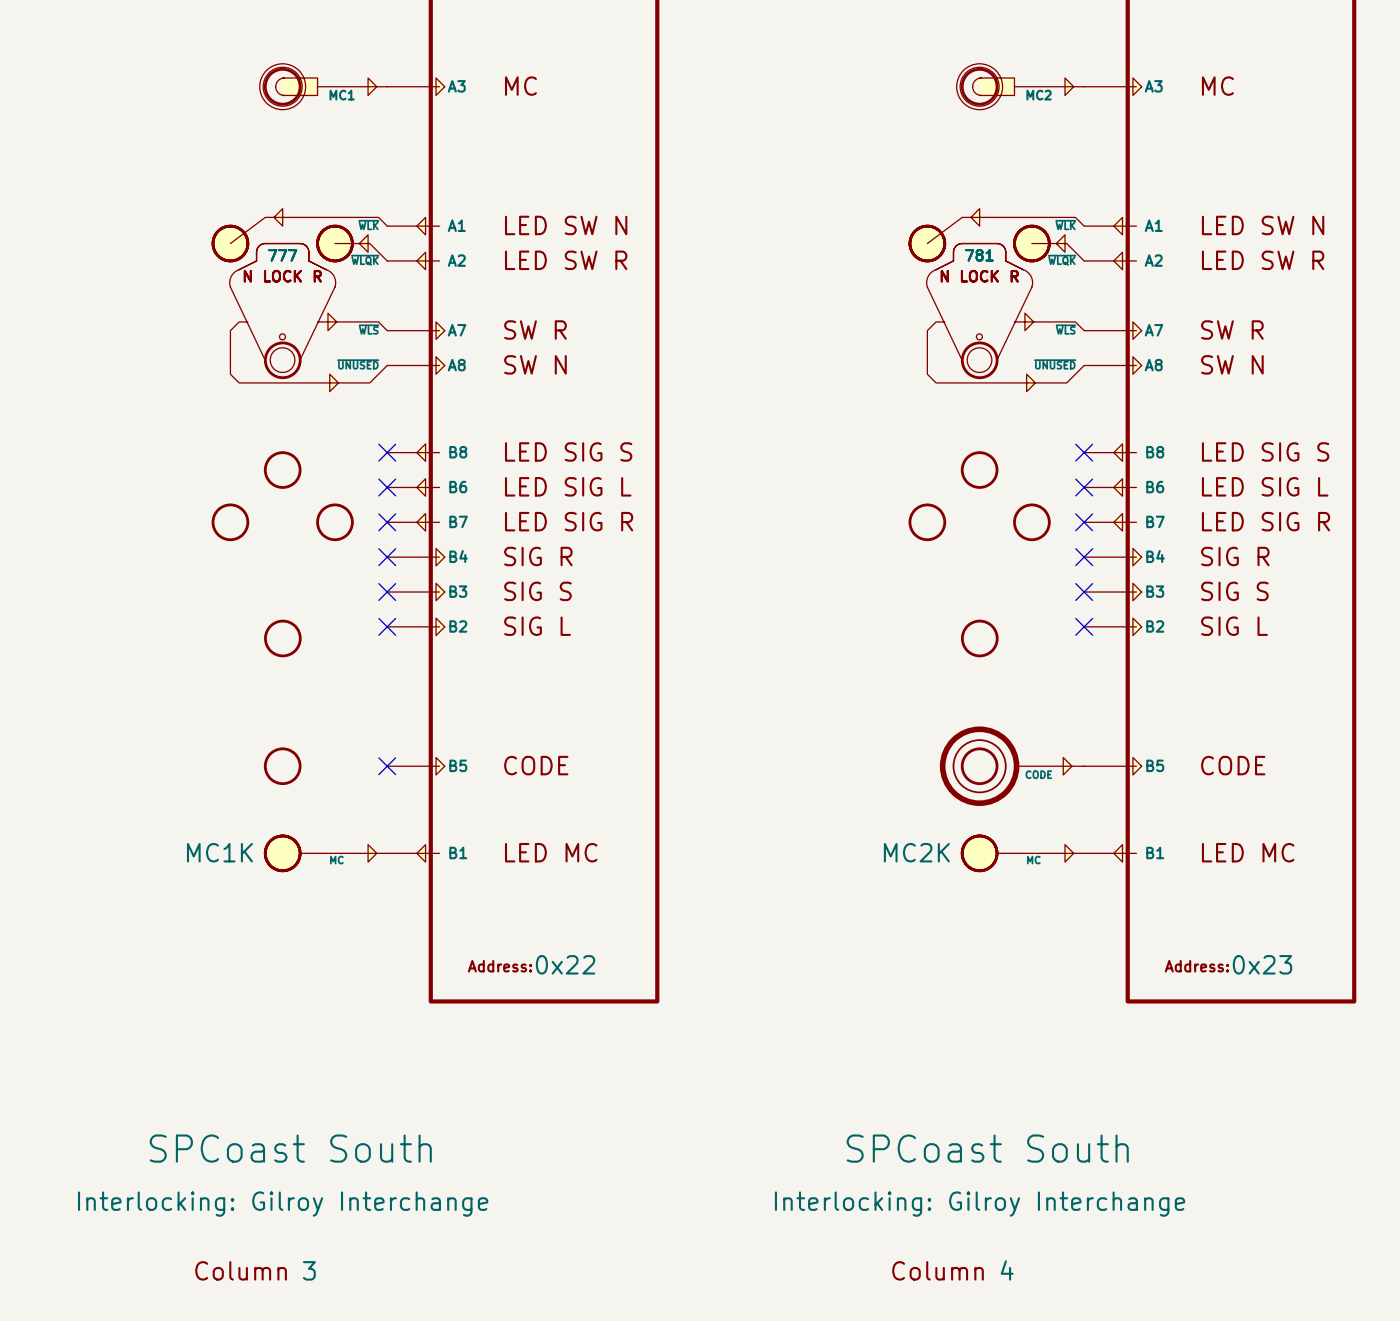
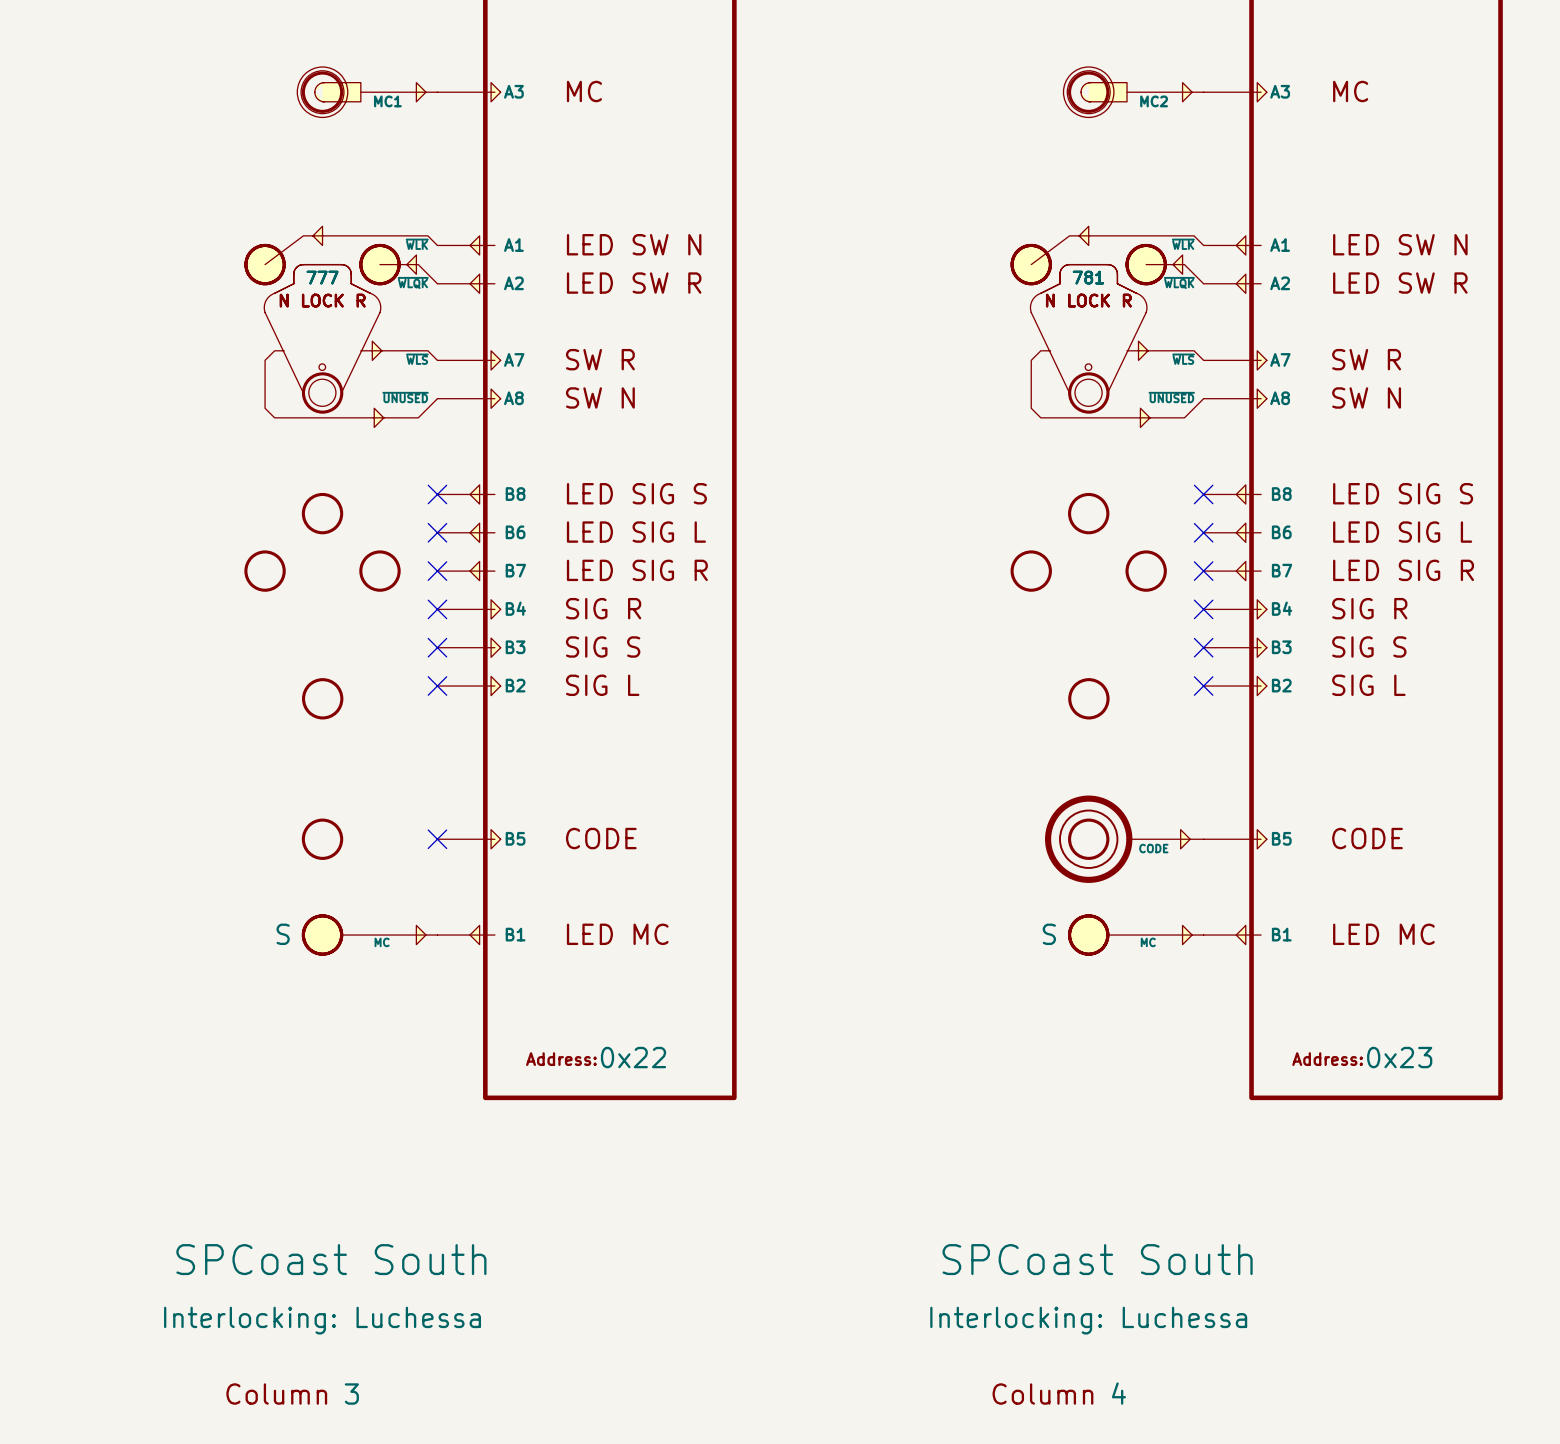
part text: MC1K (219, 852) -> S (283, 934)
part text: MC2K (916, 852) -> S (1049, 934)
part text: Interlocking: Gilroy Interchange (283, 1204) -> Interlocking: Luchessa (322, 1320)
part text: Interlocking: Gilroy Interchange (980, 1204) -> Interlocking: Luchessa (1088, 1320)

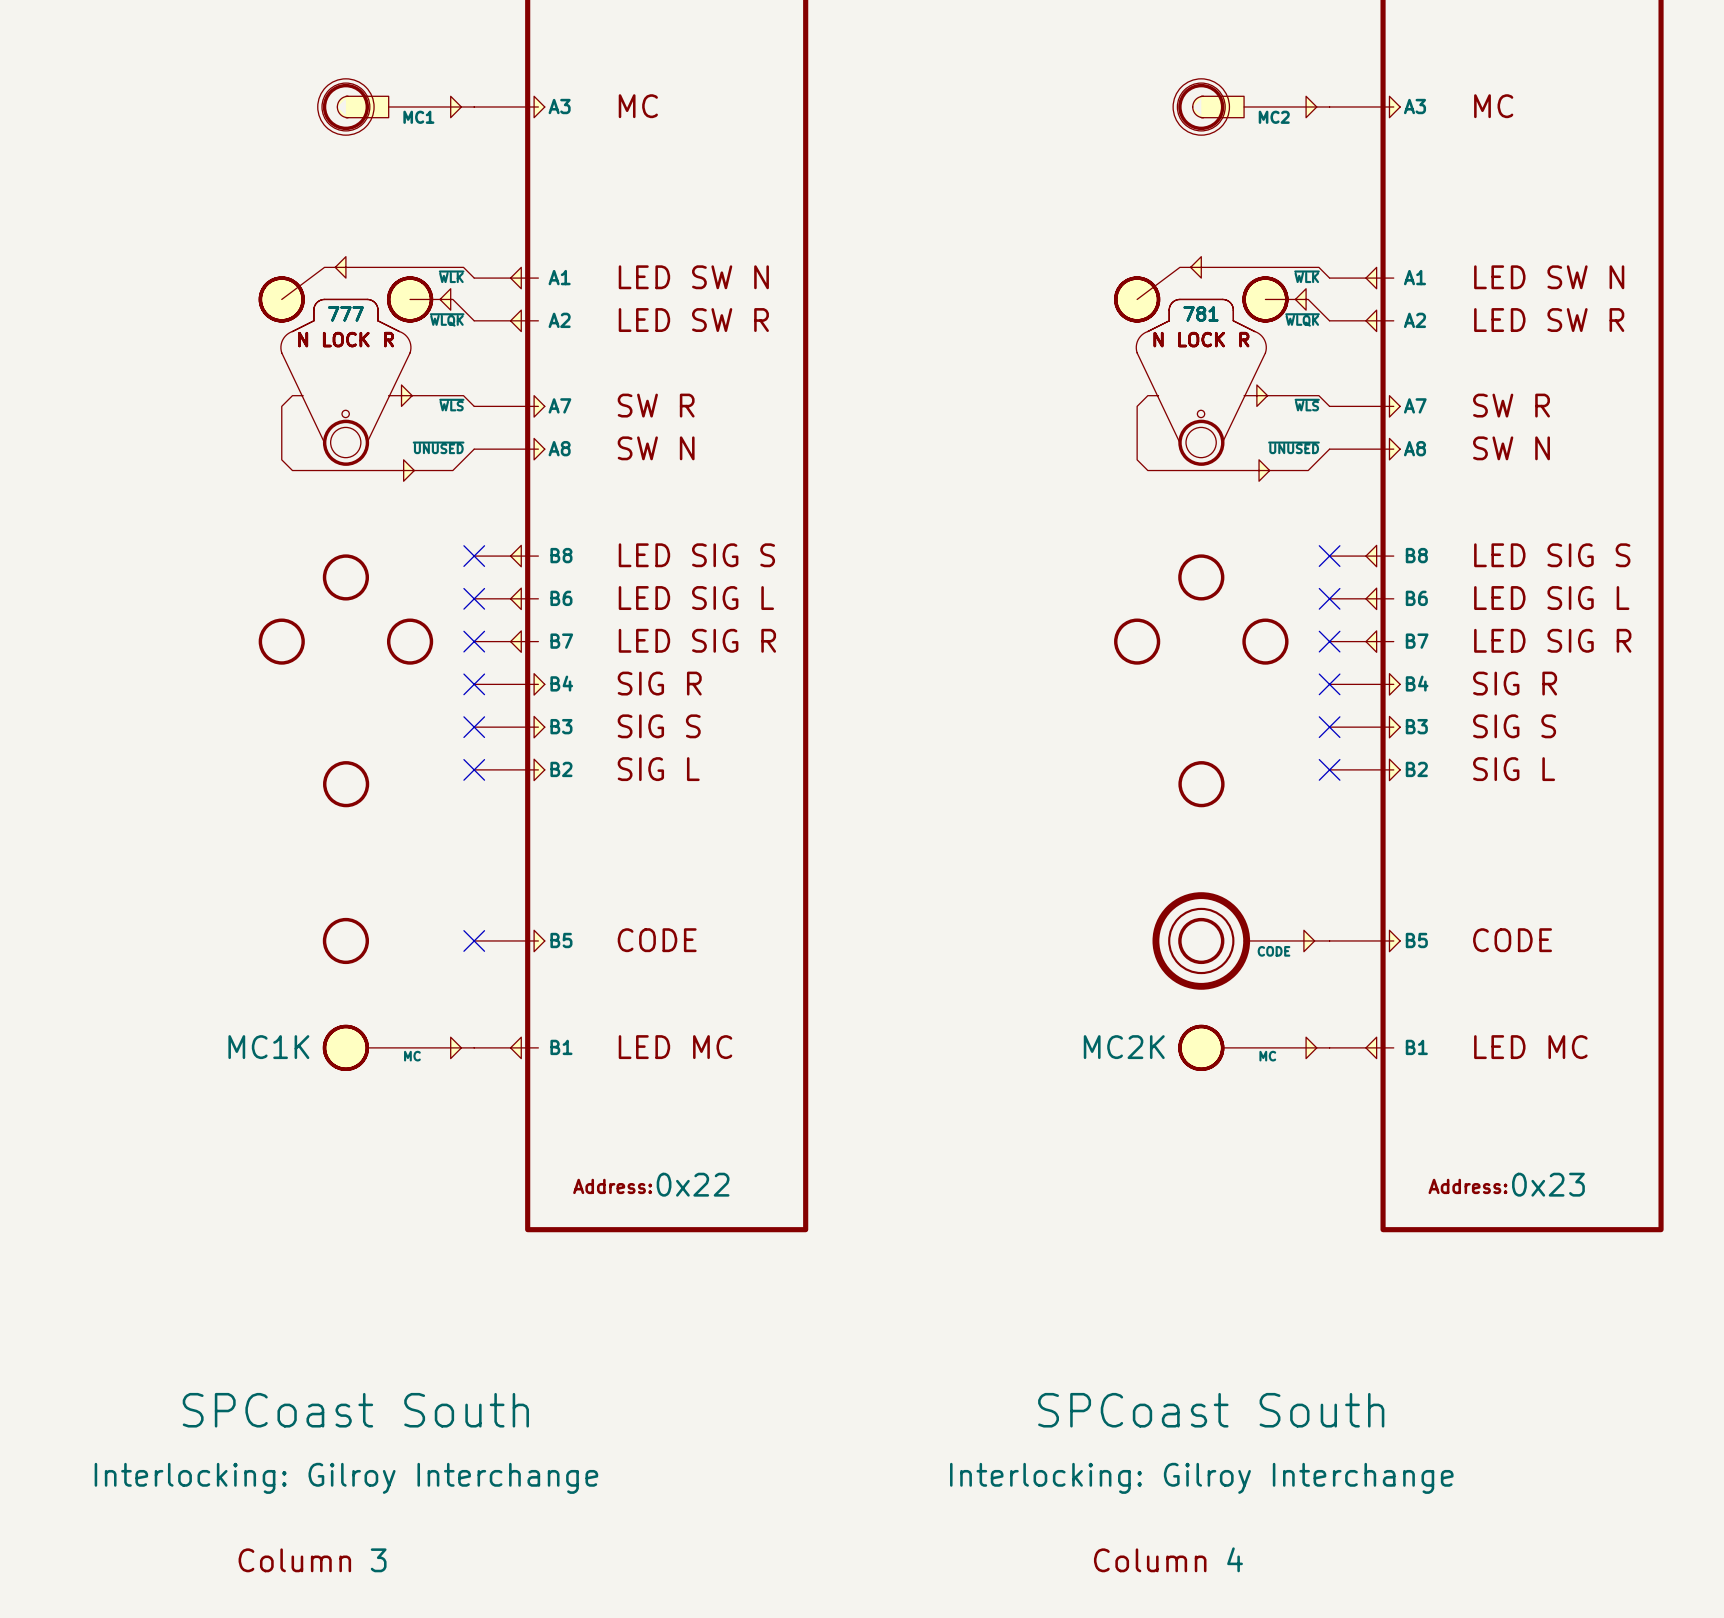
part text: S (283, 934) -> MC1K (268, 1047)
part text: S (1049, 934) -> MC2K (1124, 1047)
part text: Interlocking: Luchessa (322, 1320) -> Interlocking: Gilroy Interchange (346, 1478)
part text: Interlocking: Luchessa (1088, 1320) -> Interlocking: Gilroy Interchange (1201, 1478)

